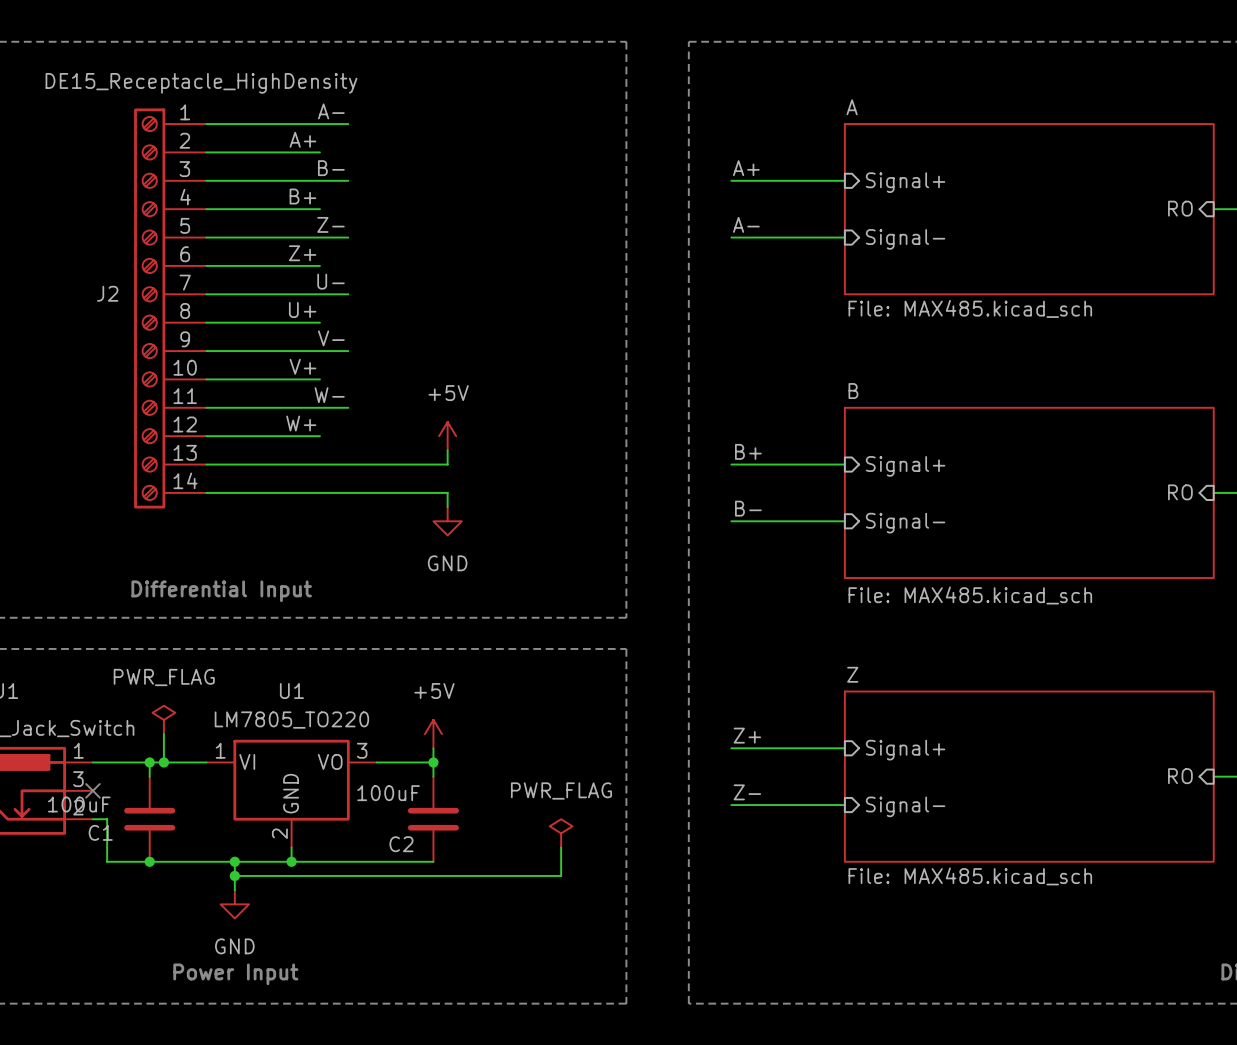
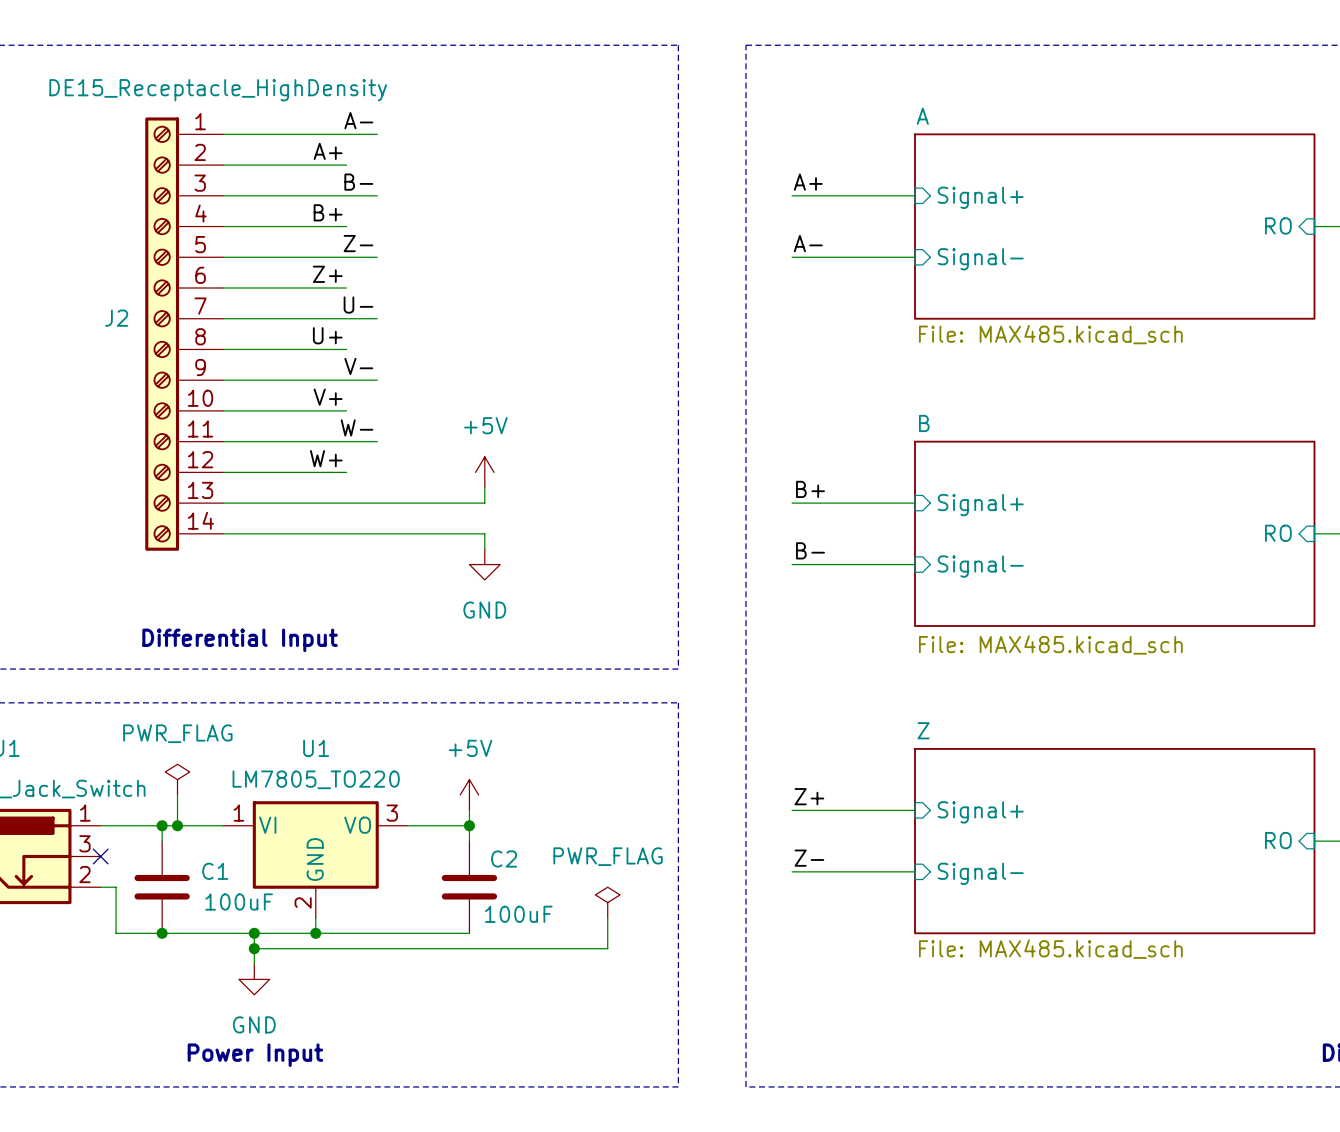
C2 value position: 100uF (388, 793) -> 100uF (518, 914)
C1 value position: 100uF (79, 804) -> 100uF (239, 902)
C1 name position: C1 (100, 832) -> C1 (215, 871)
C2 name position: C2 (401, 844) -> C2 (504, 858)

